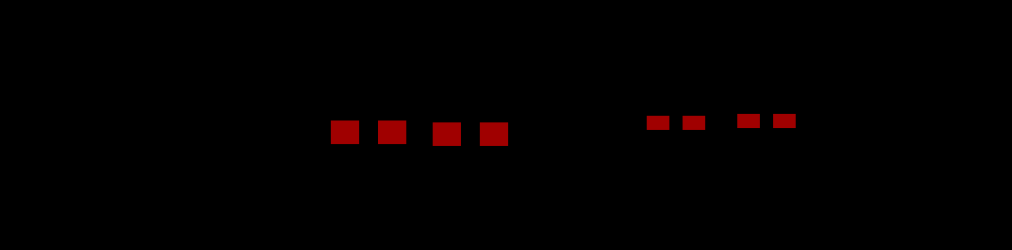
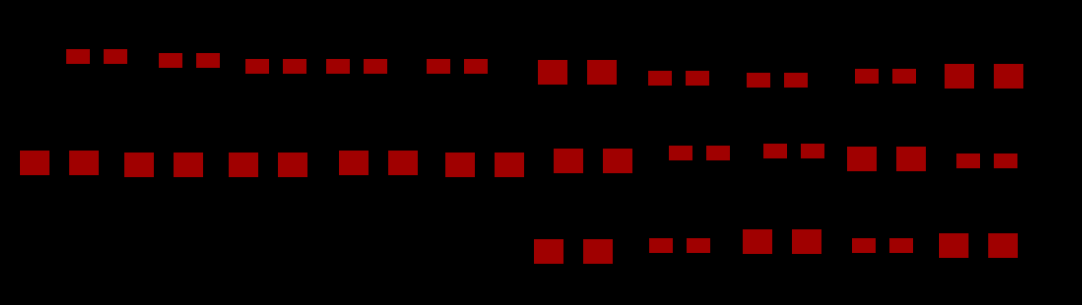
part: none -> (96, 56)
part: none -> (189, 60)
part: none -> (275, 66)
part: none -> (356, 66)
part: none -> (457, 66)
part: none -> (577, 72)
part: none -> (885, 76)
part: none -> (983, 76)
part: none -> (678, 78)
part: none -> (777, 80)
part: none -> (886, 158)
part: none -> (593, 160)
part: none -> (986, 160)
part: none -> (59, 162)
part: none -> (163, 164)
part: none -> (268, 164)
part: none -> (782, 241)
part: none -> (679, 245)
part: none -> (882, 245)
part: none -> (978, 245)
part: none -> (573, 251)

